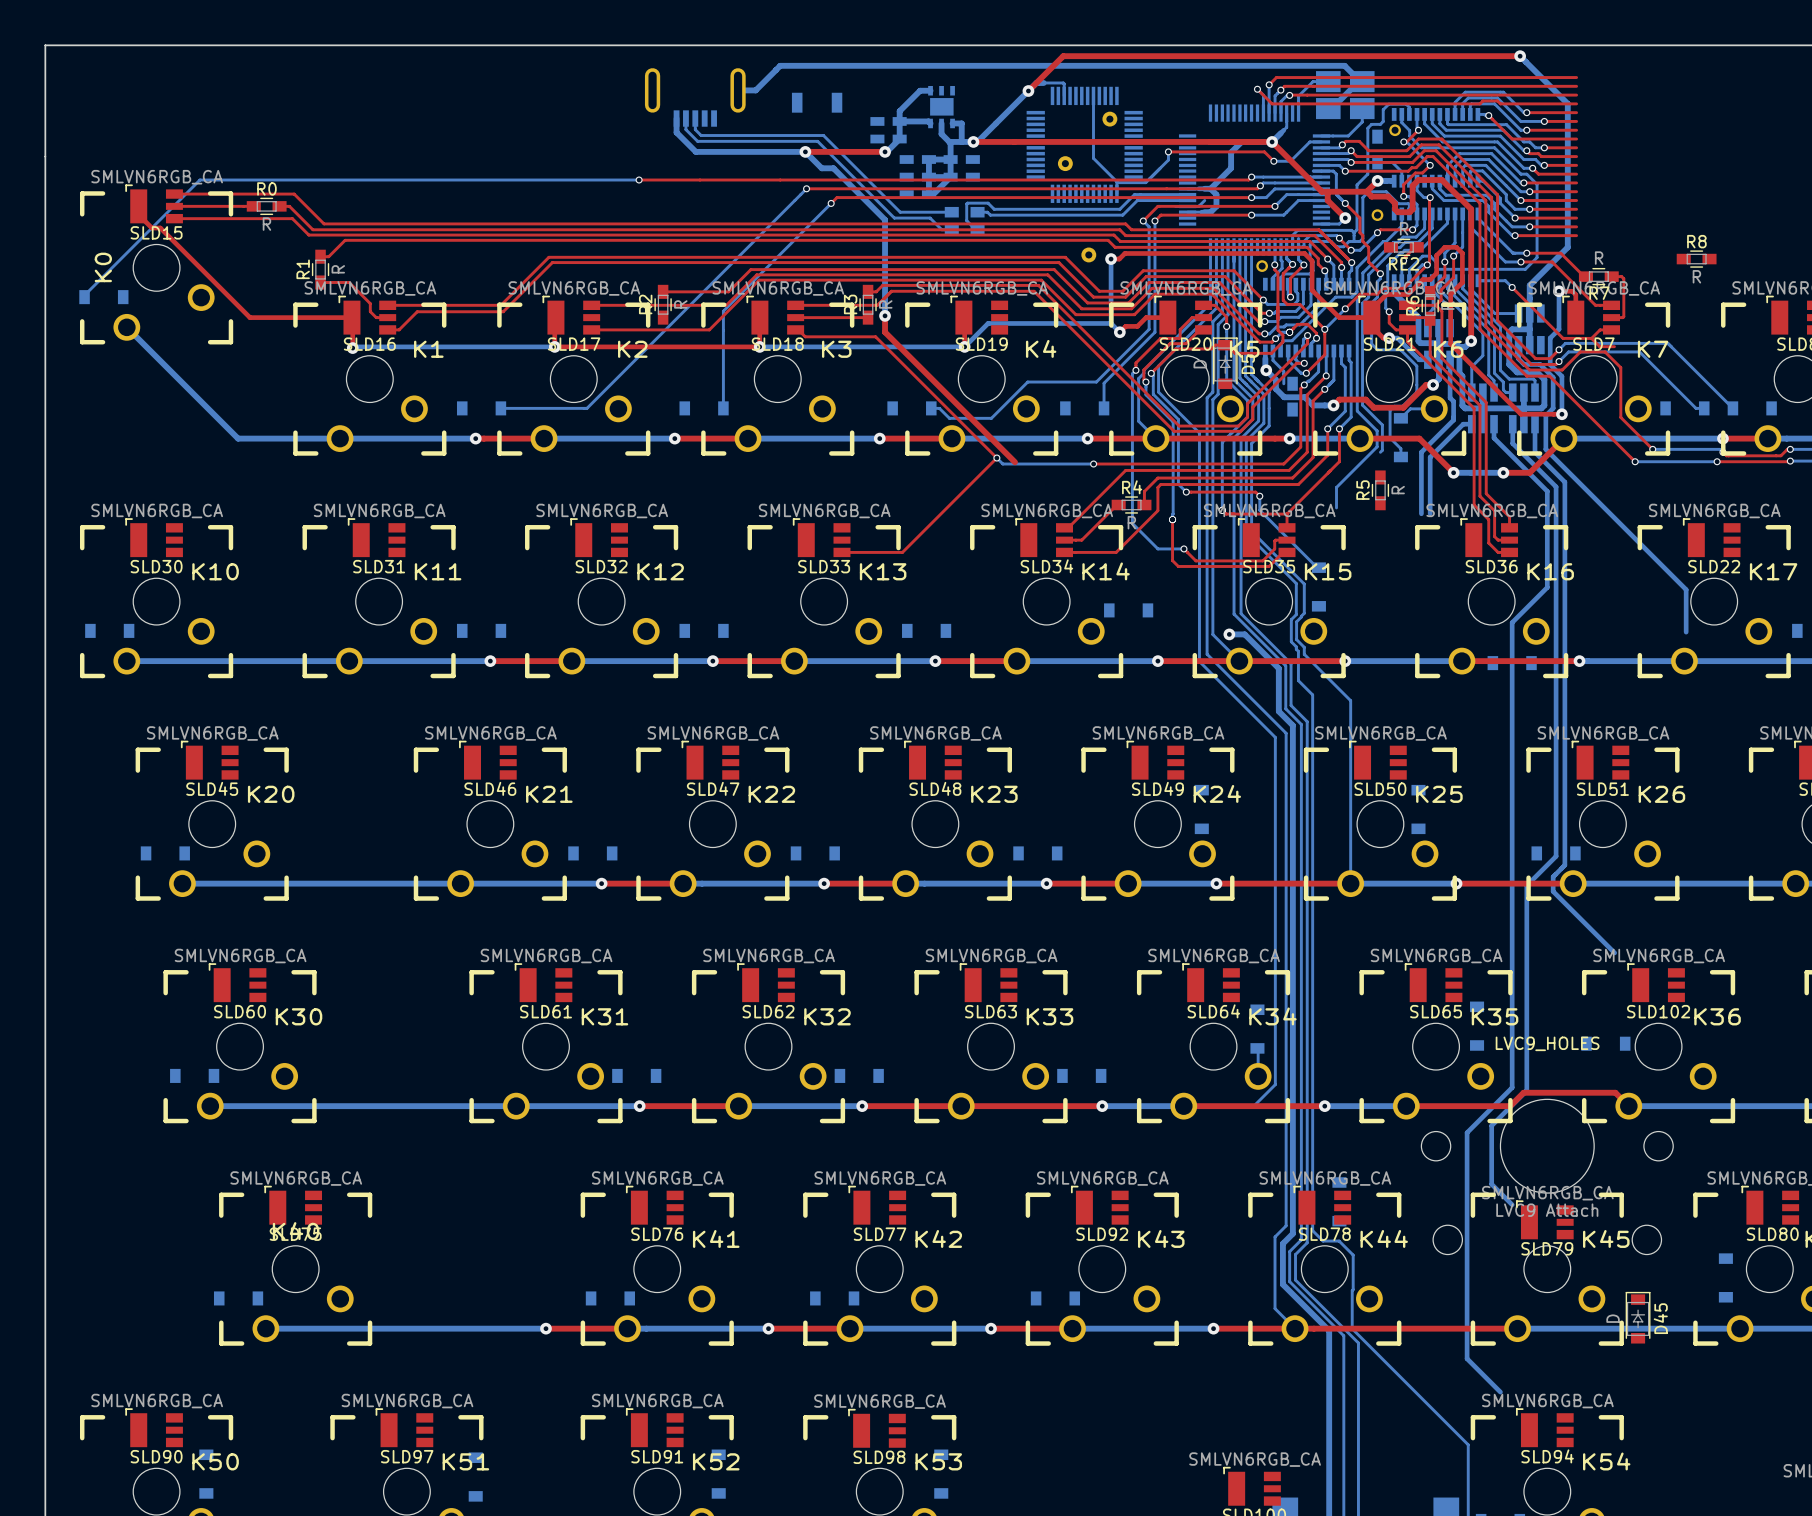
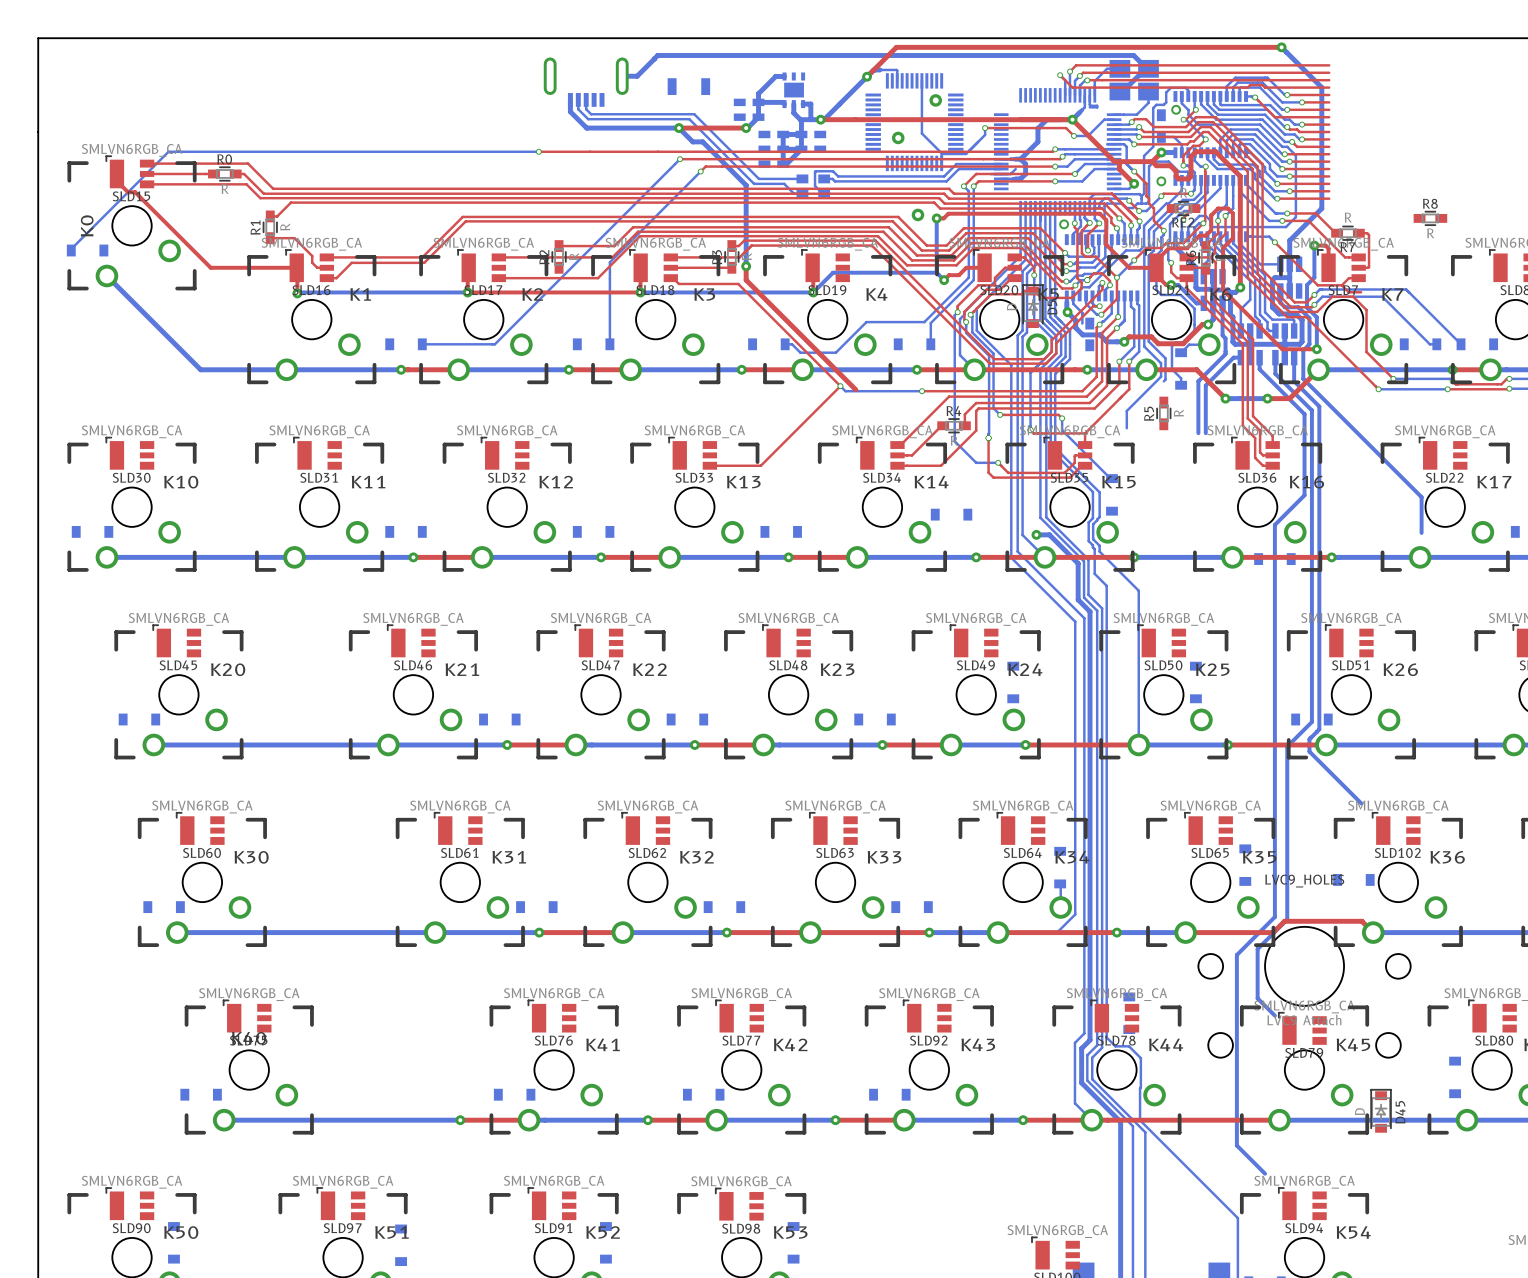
bottom track: none -> (1089, 95) (1089, 104) (1097, 107) (1089, 107)

